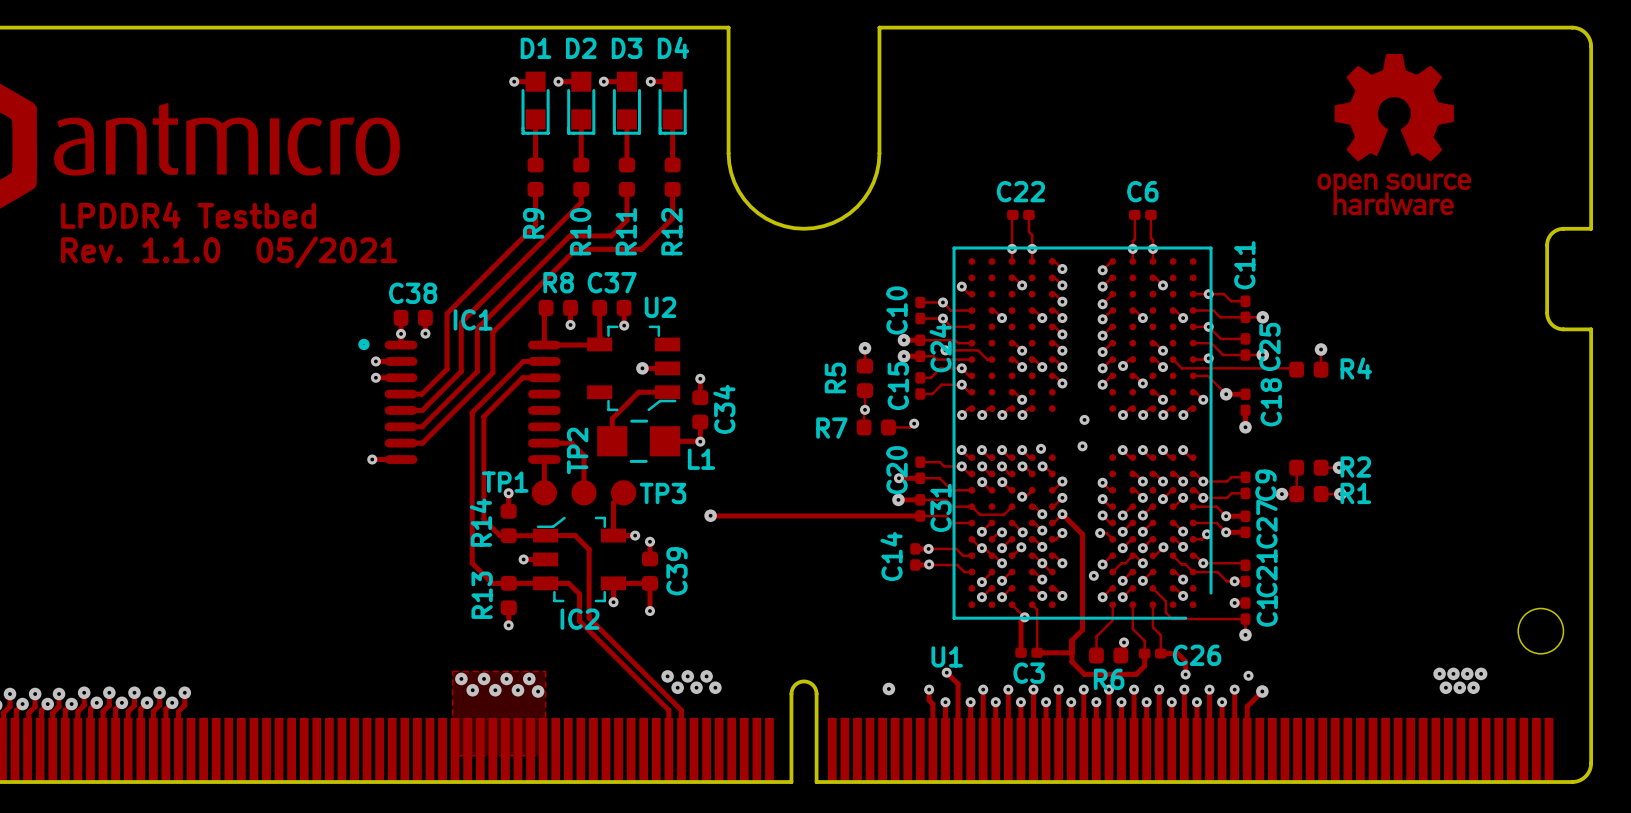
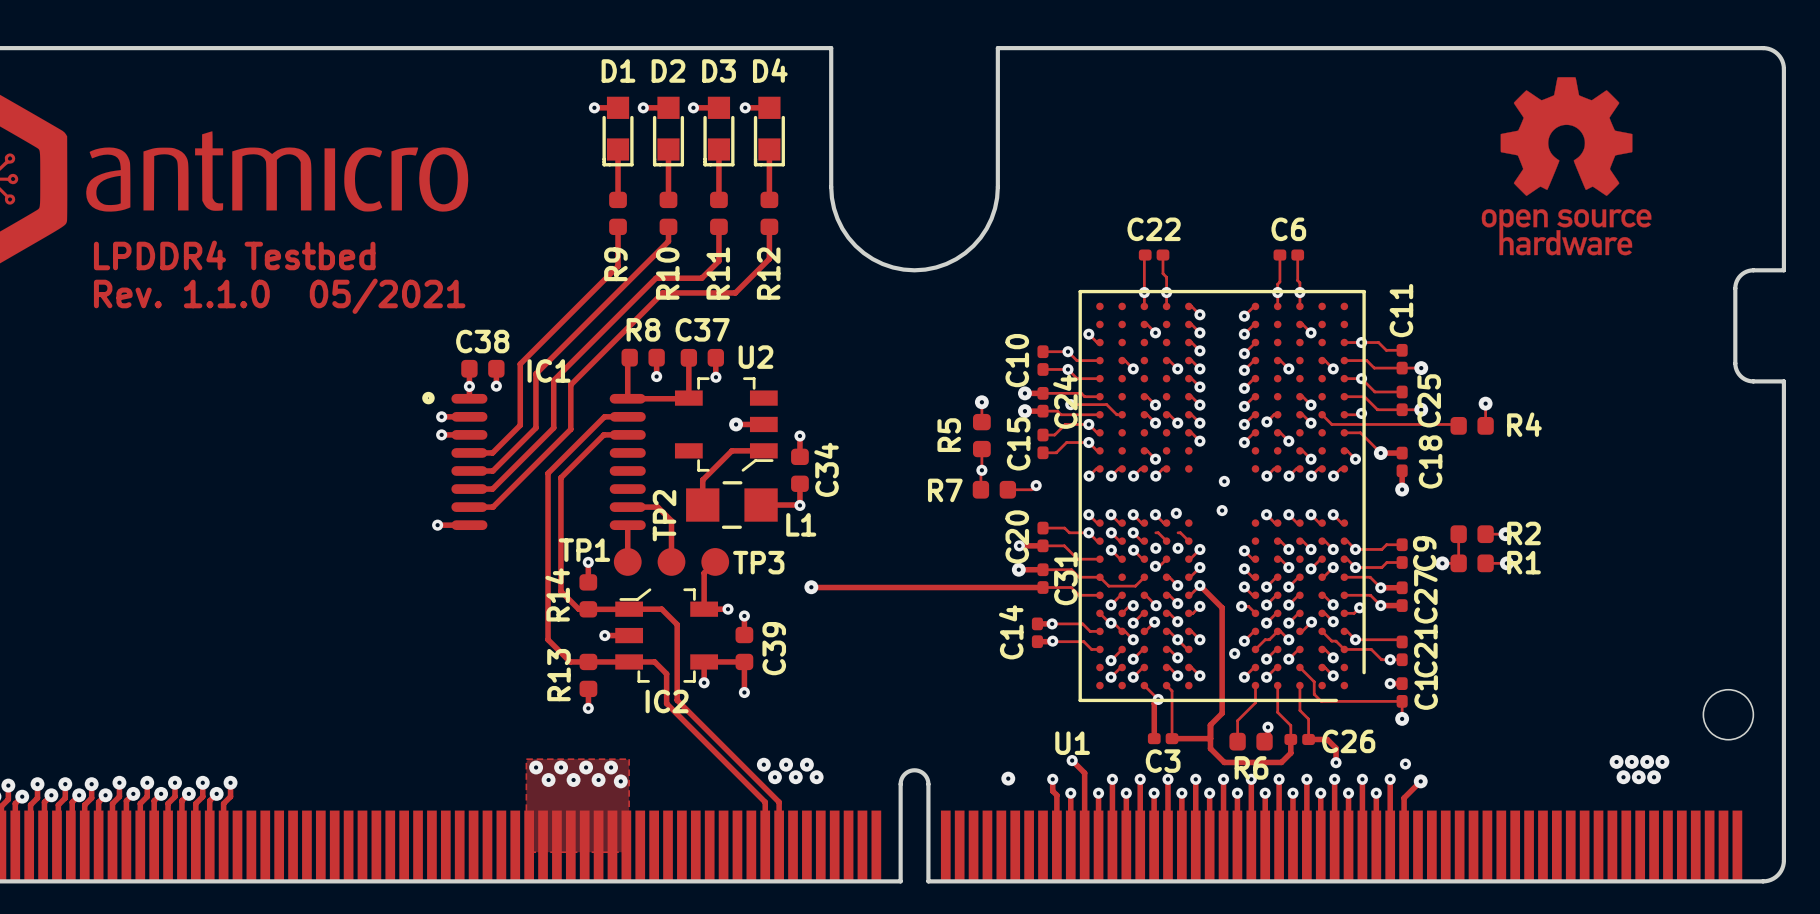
via: (1022, 466) -> none
via: (1042, 466) -> none
via: none -> (1155, 548)
via: none -> (1178, 548)

